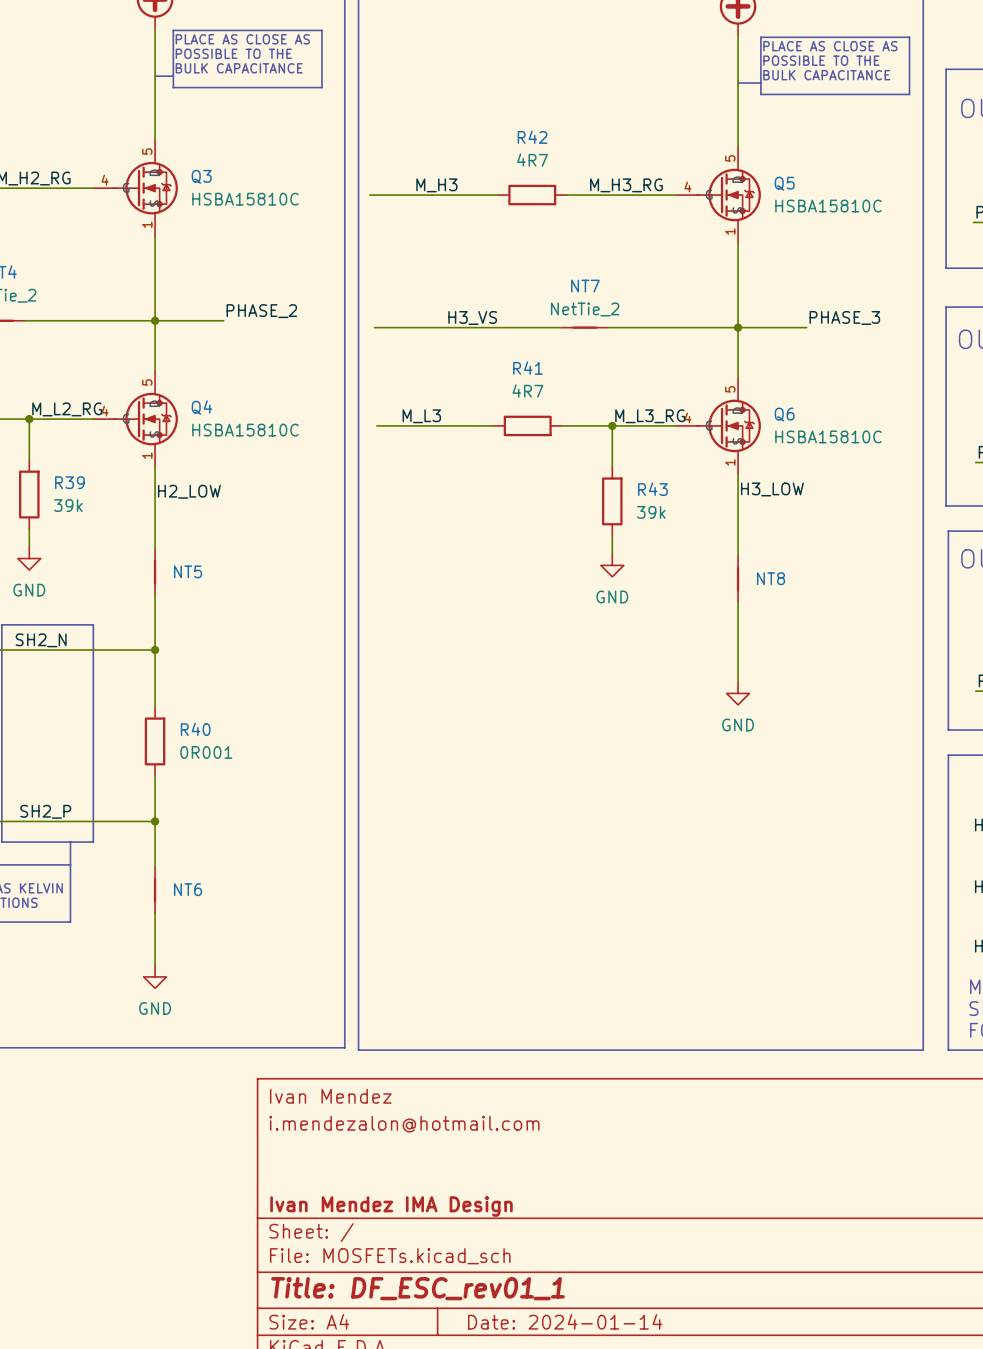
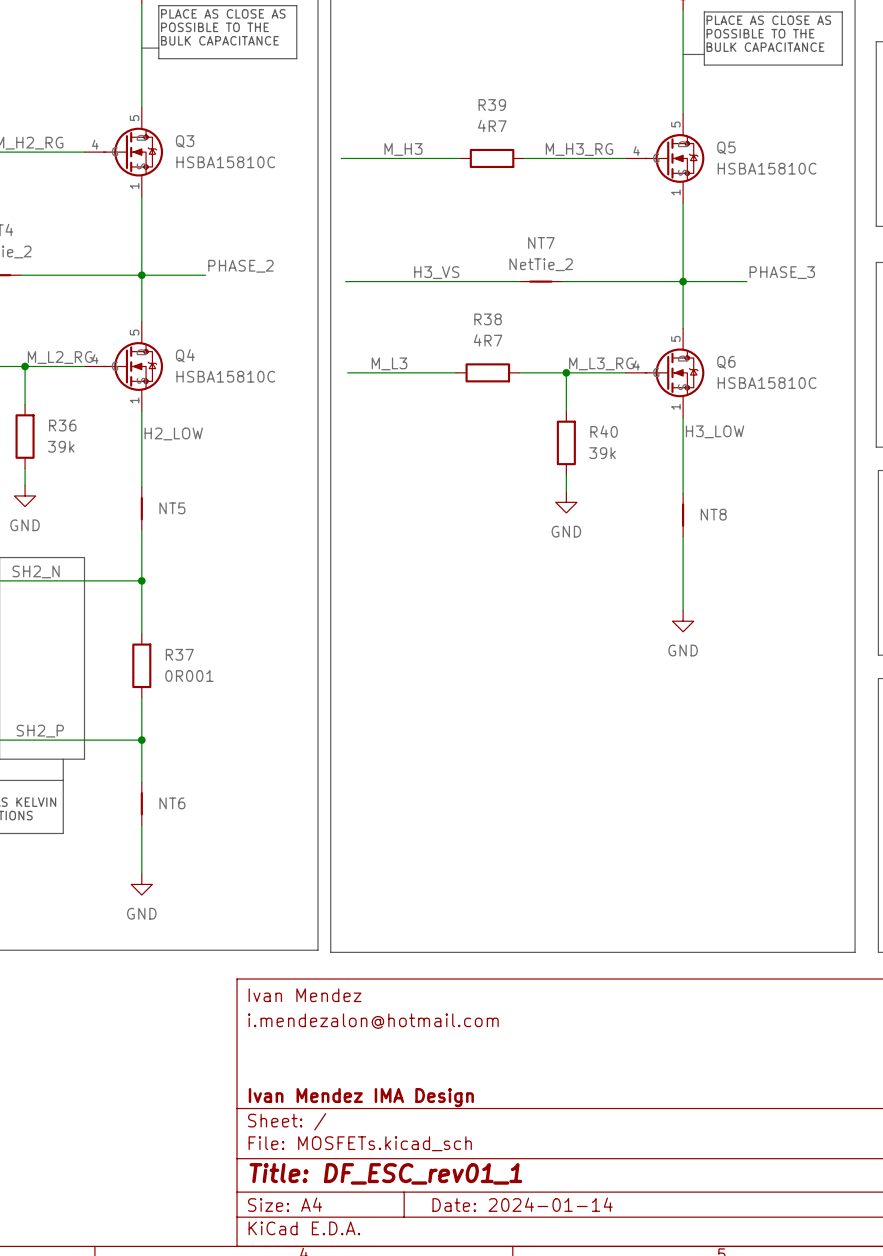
R42 name: R42 (532, 137) -> R39 (492, 105)
R41 name: R41 (527, 368) -> R38 (488, 319)
R39 name: R39 (69, 482) -> R36 (62, 425)
R43 name: R43 (652, 489) -> R40 (604, 431)
R40 name: R40 (195, 729) -> R37 (179, 654)

